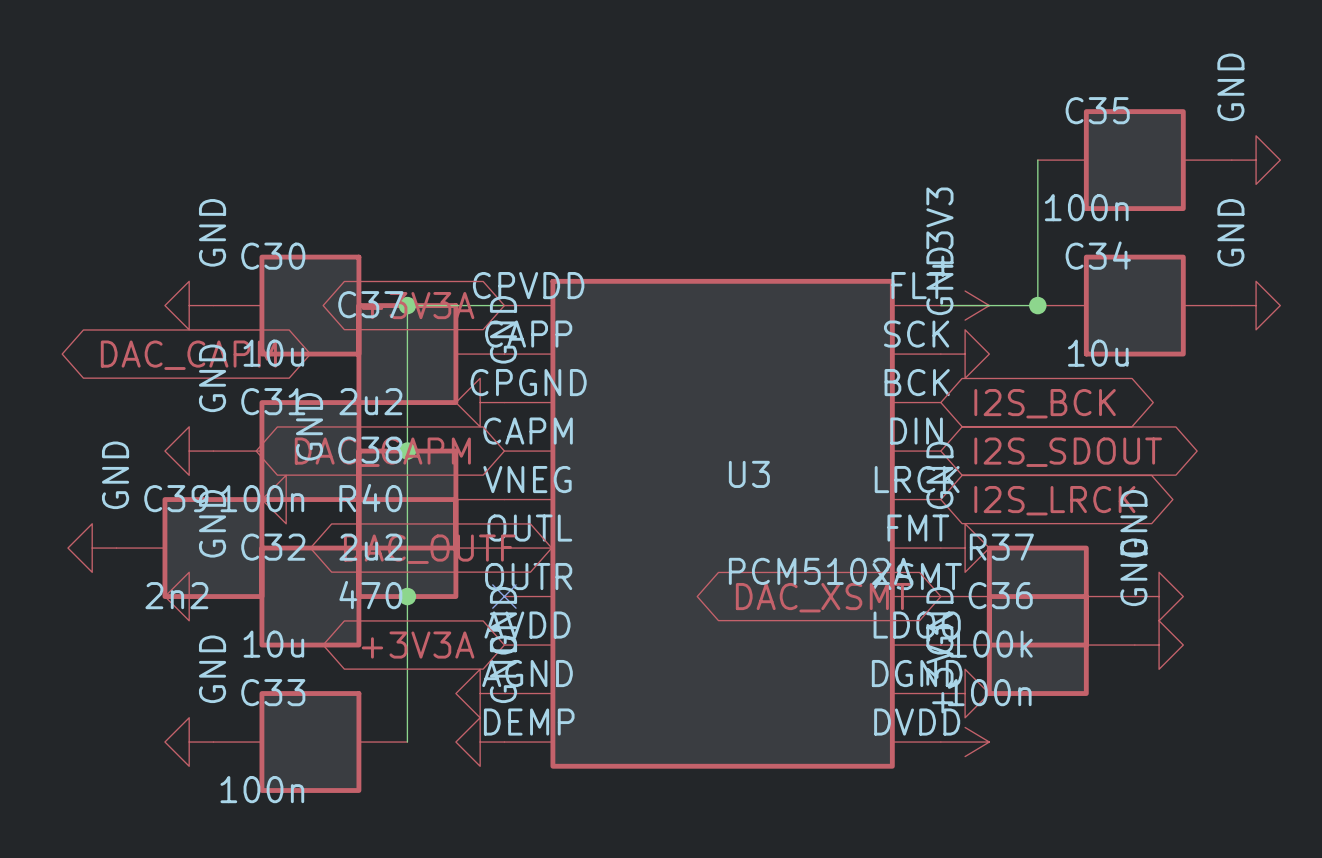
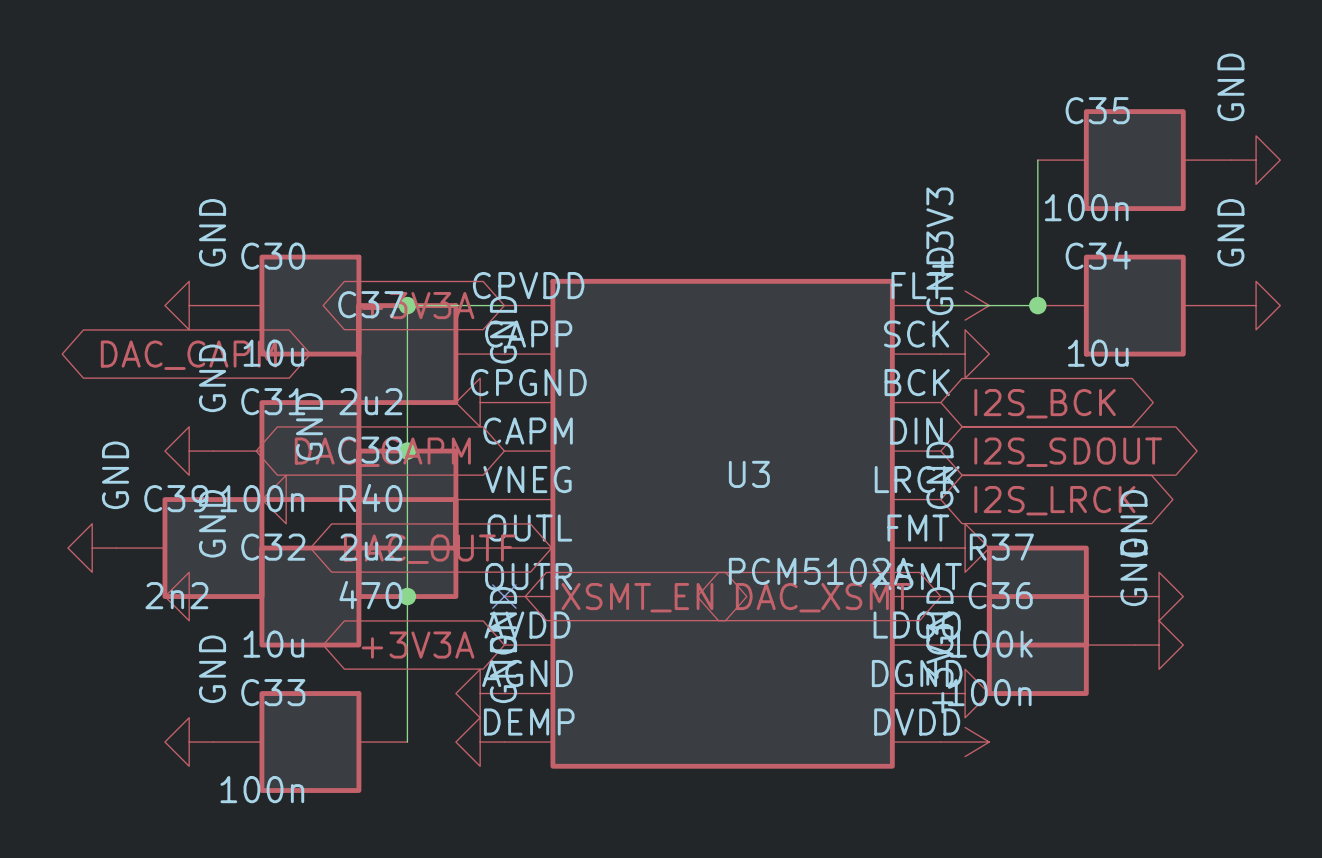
global label: none -> XSMT_EN (637, 597)

